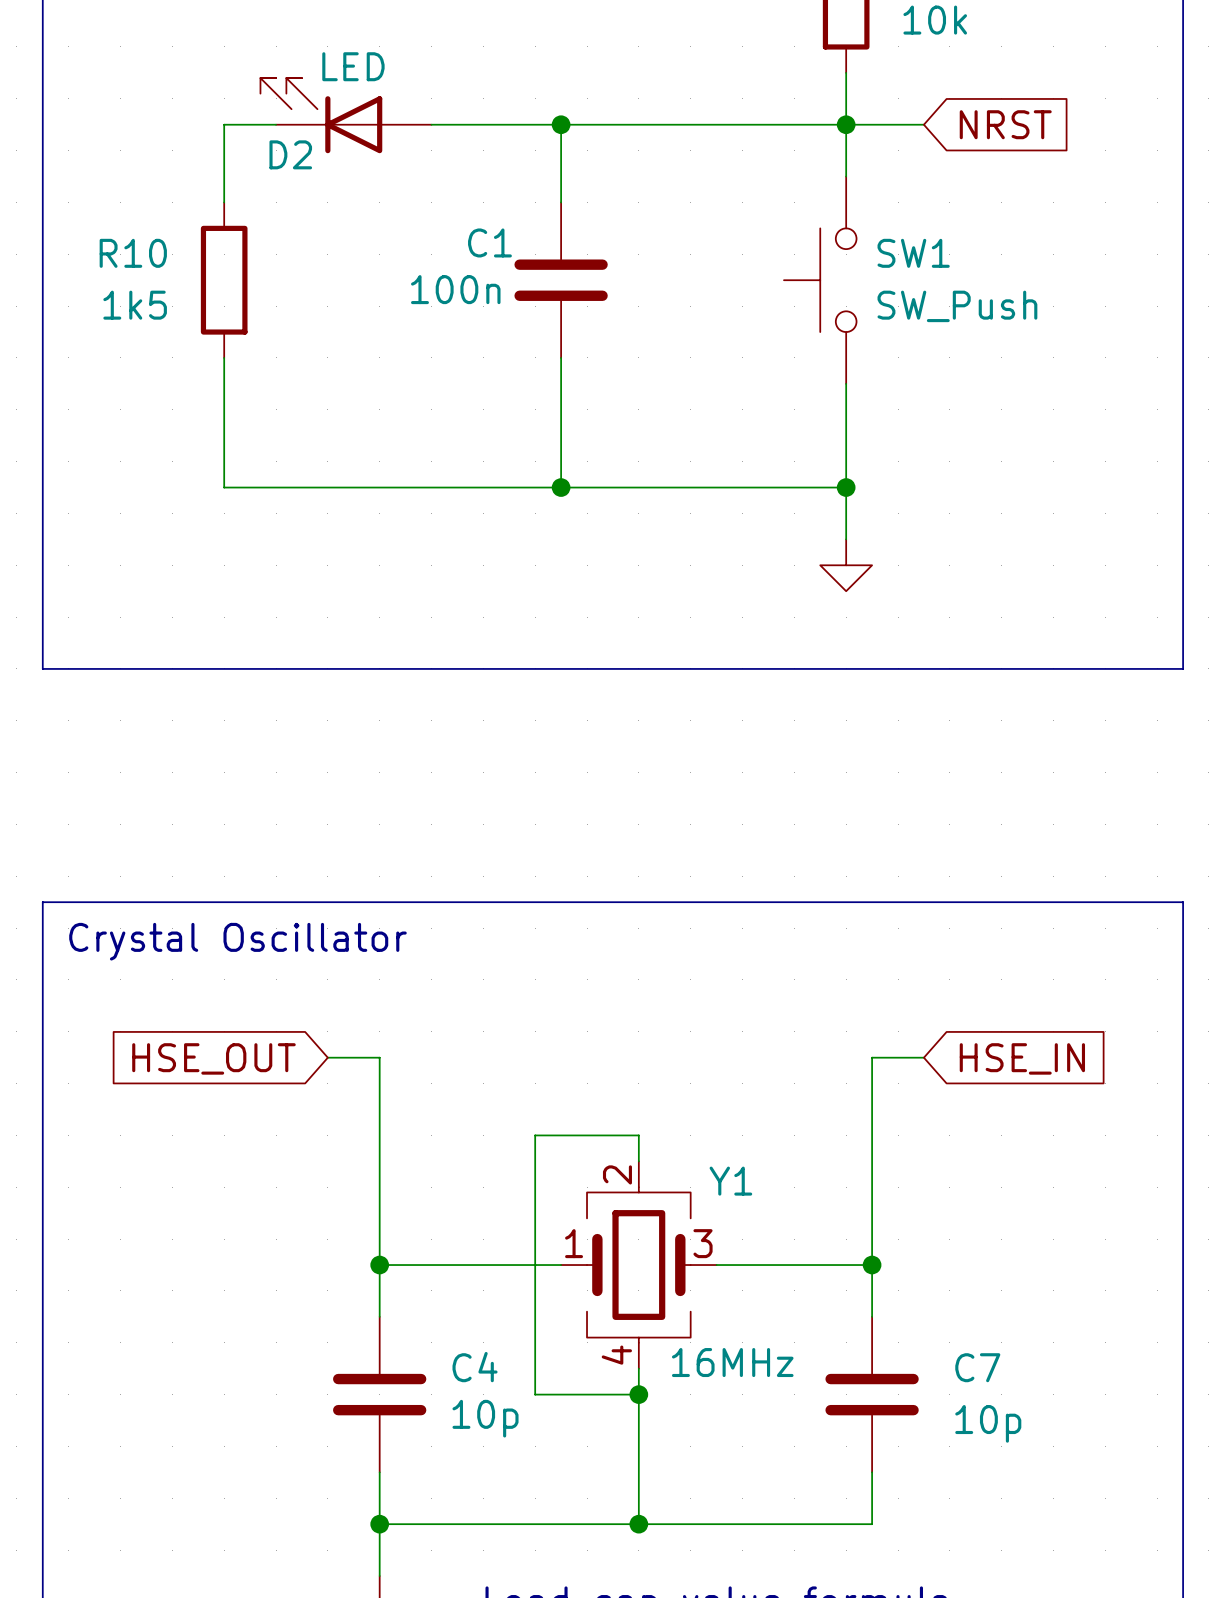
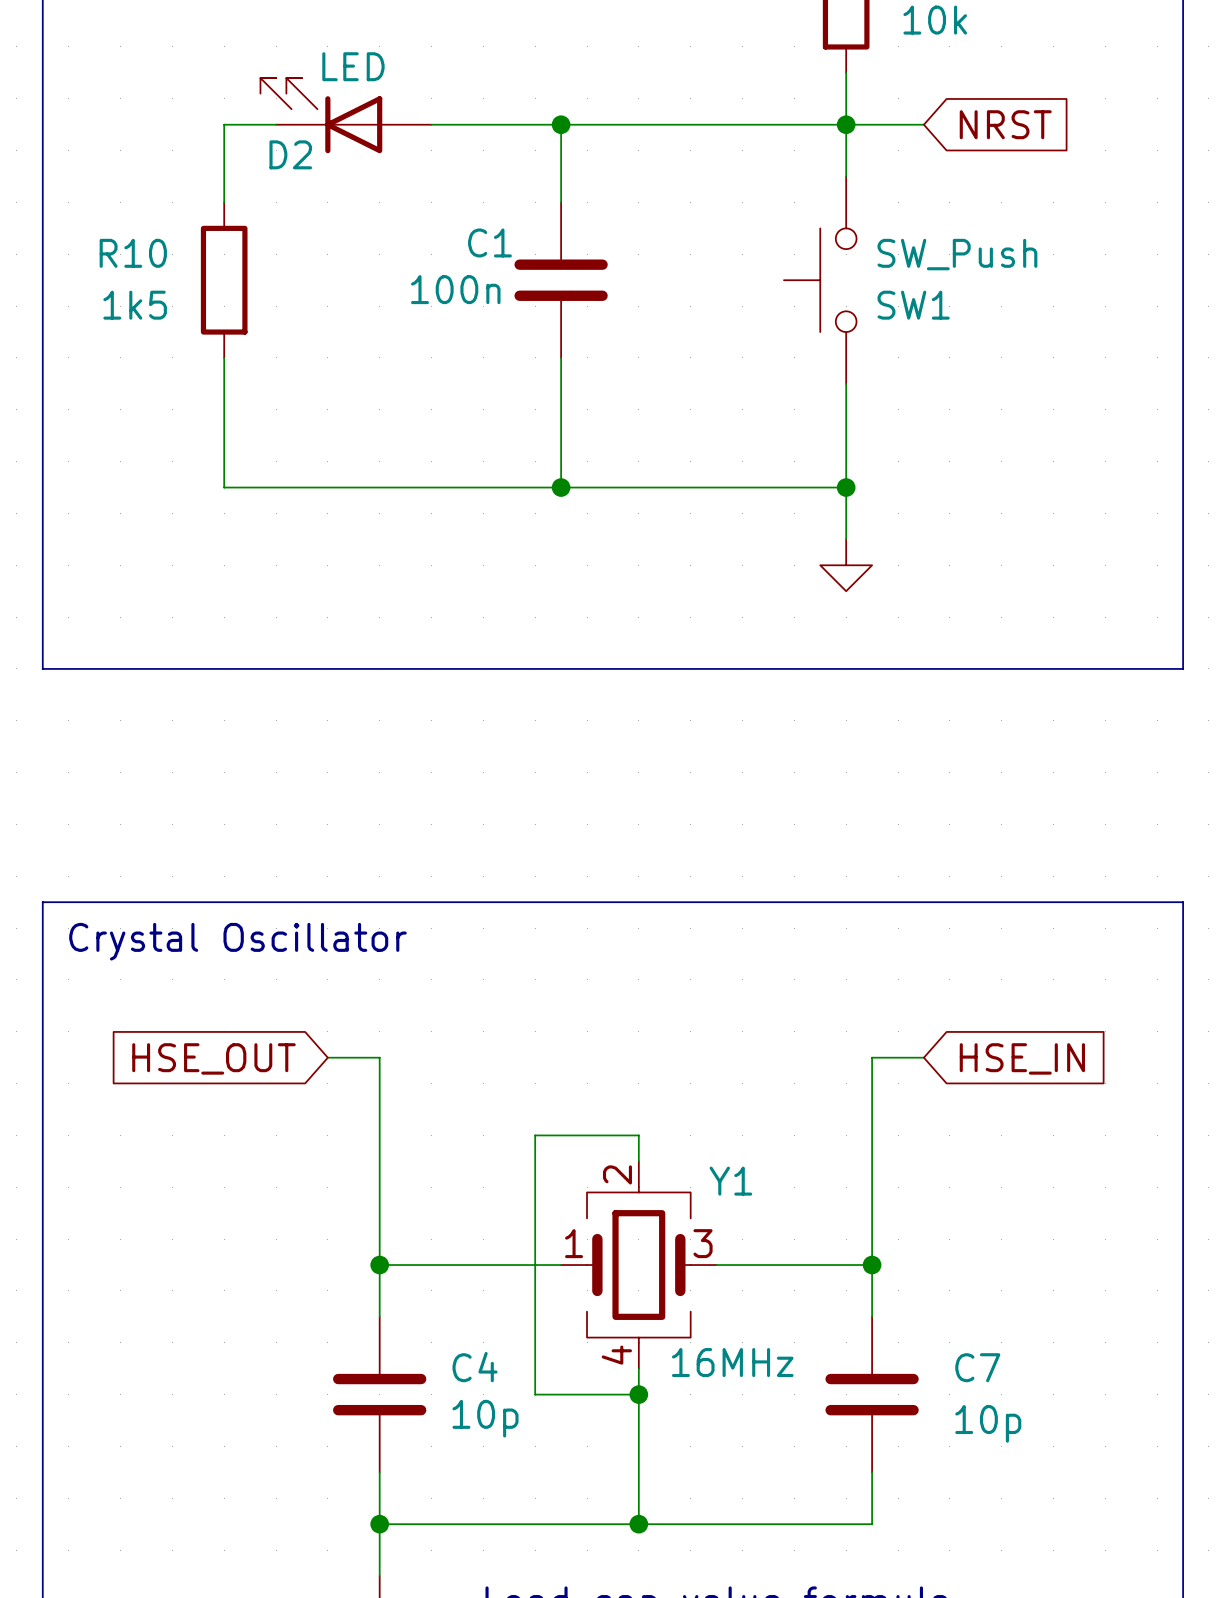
SW1 name position: SW1 (913, 253) -> SW1 (913, 305)
SW1 value position: SW_Push (957, 306) -> SW_Push (957, 254)

